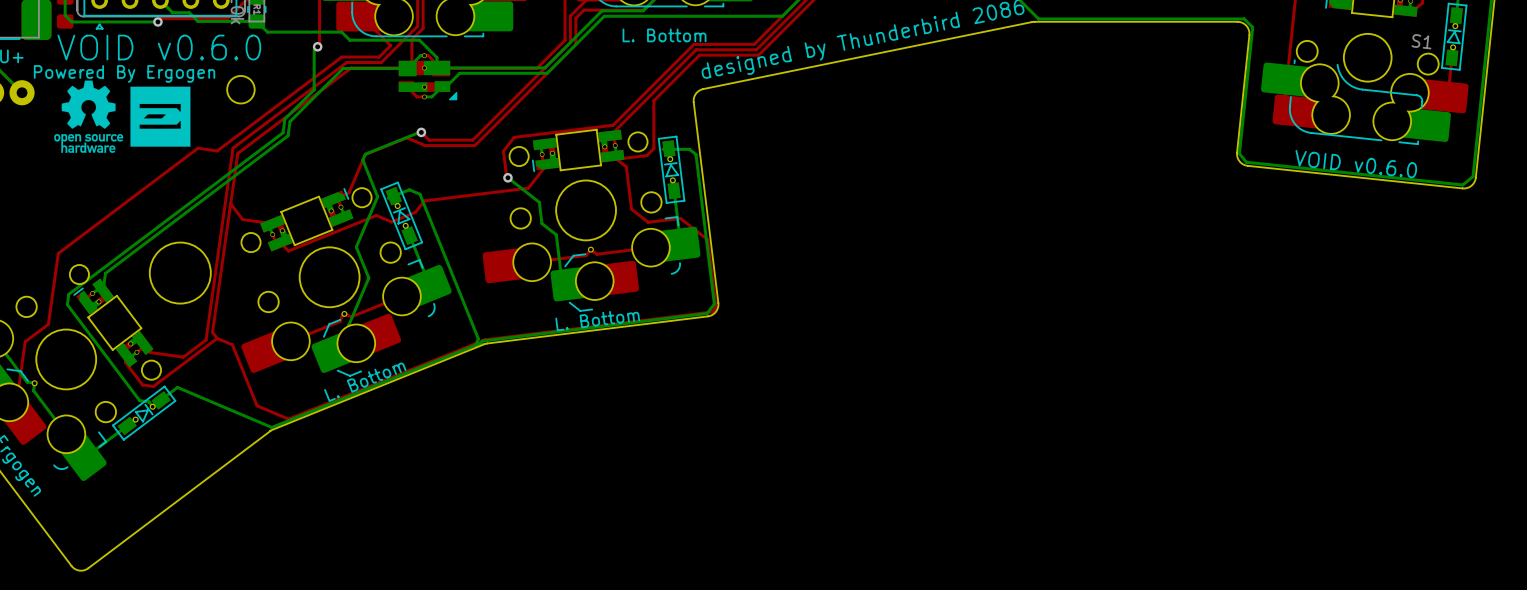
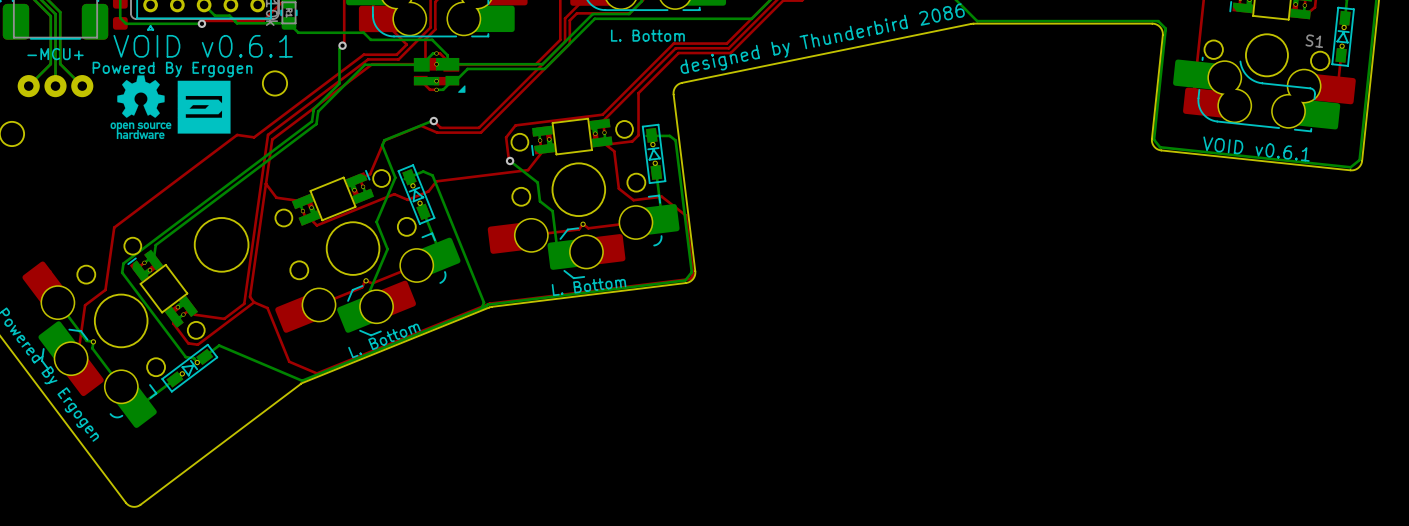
text: VOID v0.6.0 (159, 47) -> VOID v0.6.1 (203, 46)
text: VOID v0.6.0 (1356, 164) -> VOID v0.6.1 (1256, 149)

